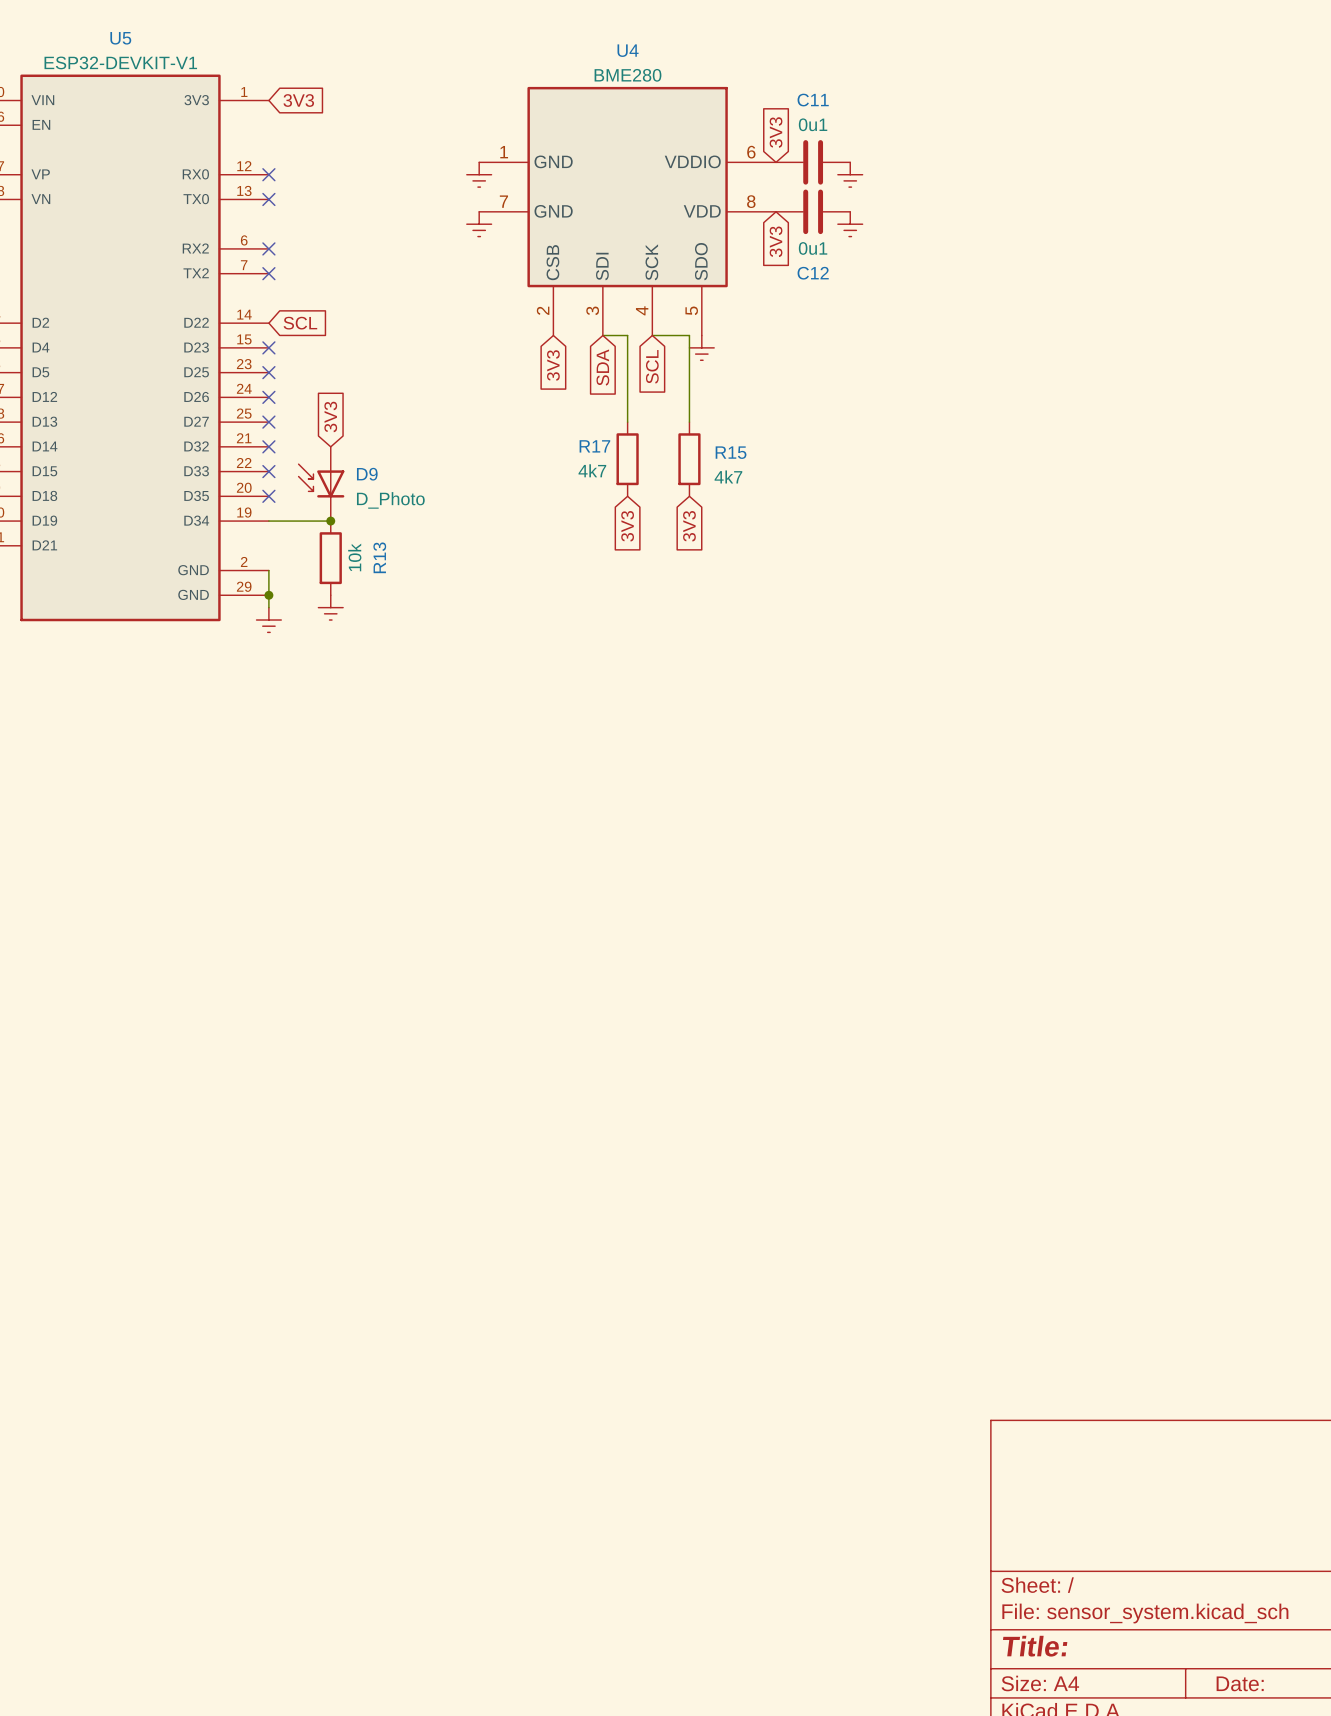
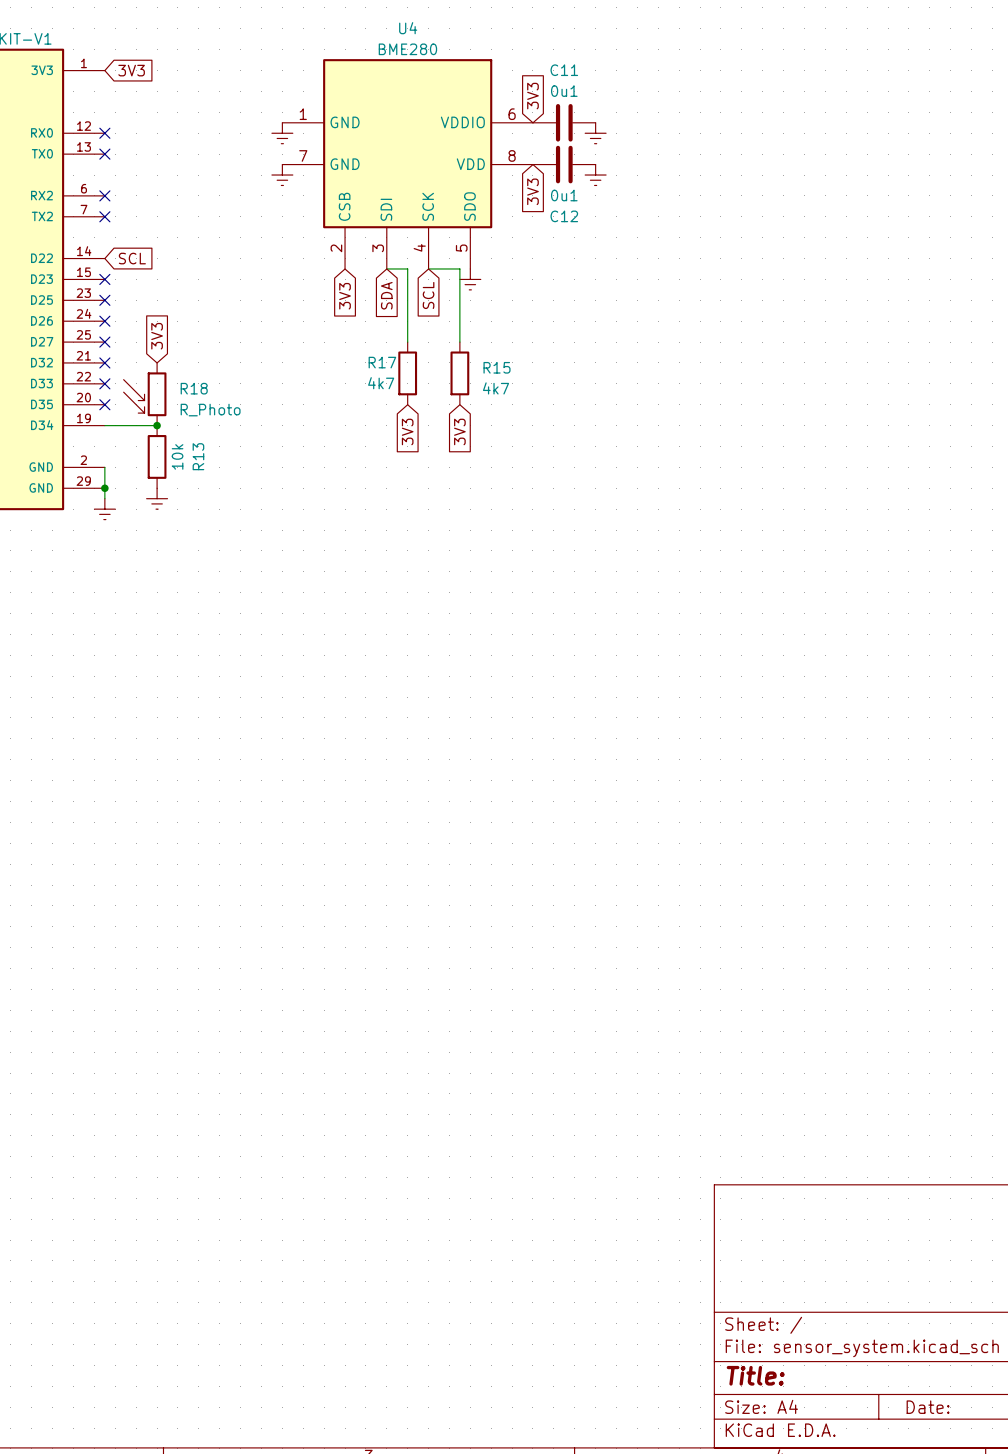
R18: none -> R_Photo (145, 394)
D9: D_Photo (321, 483) -> none

